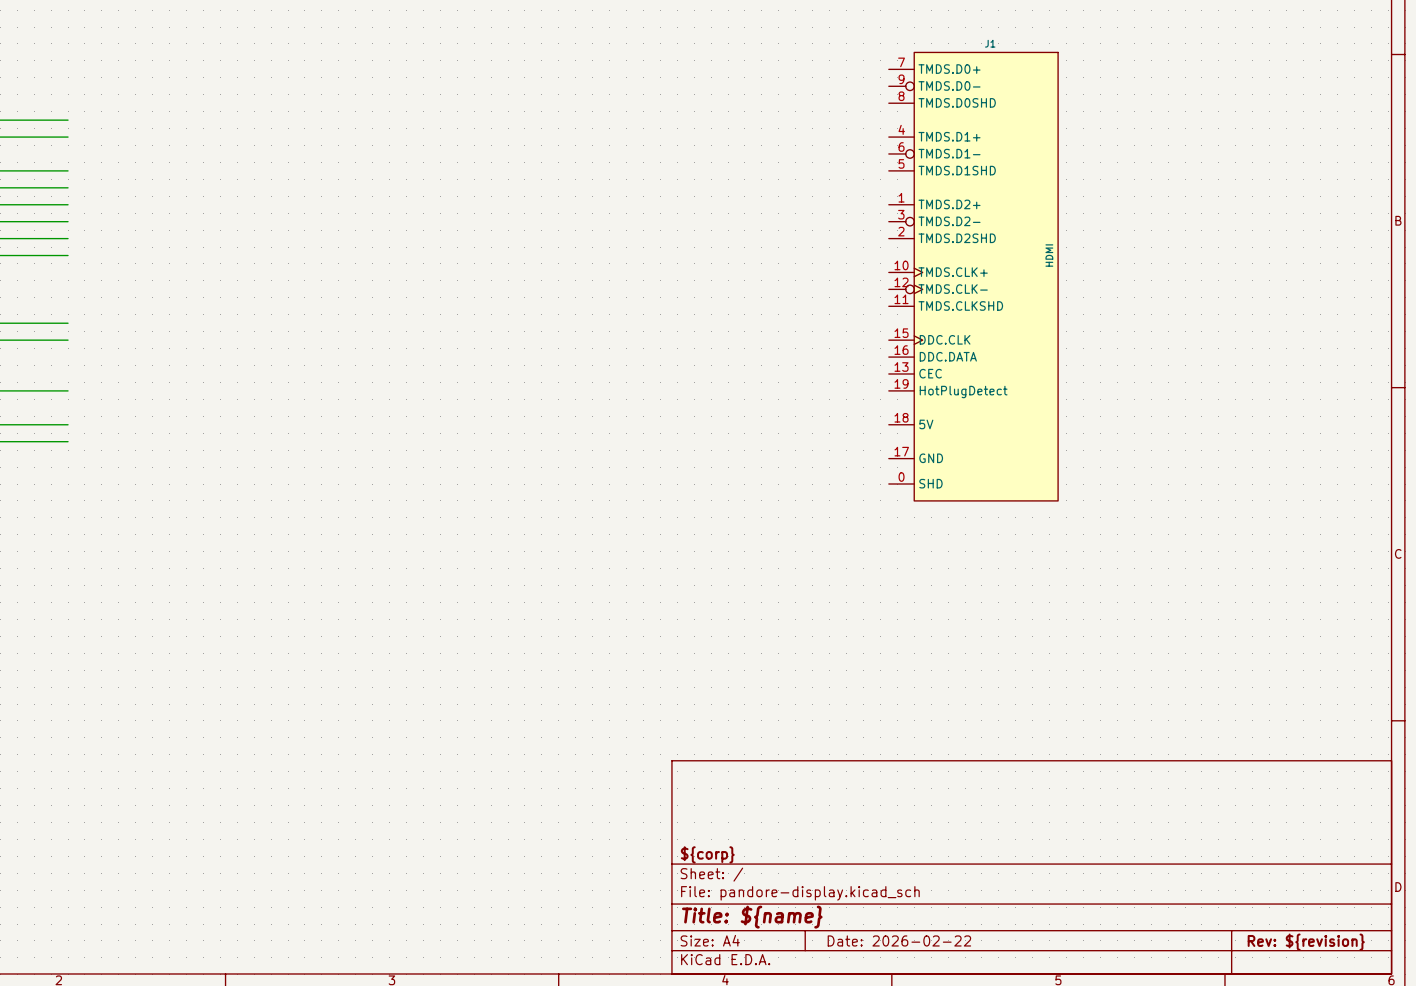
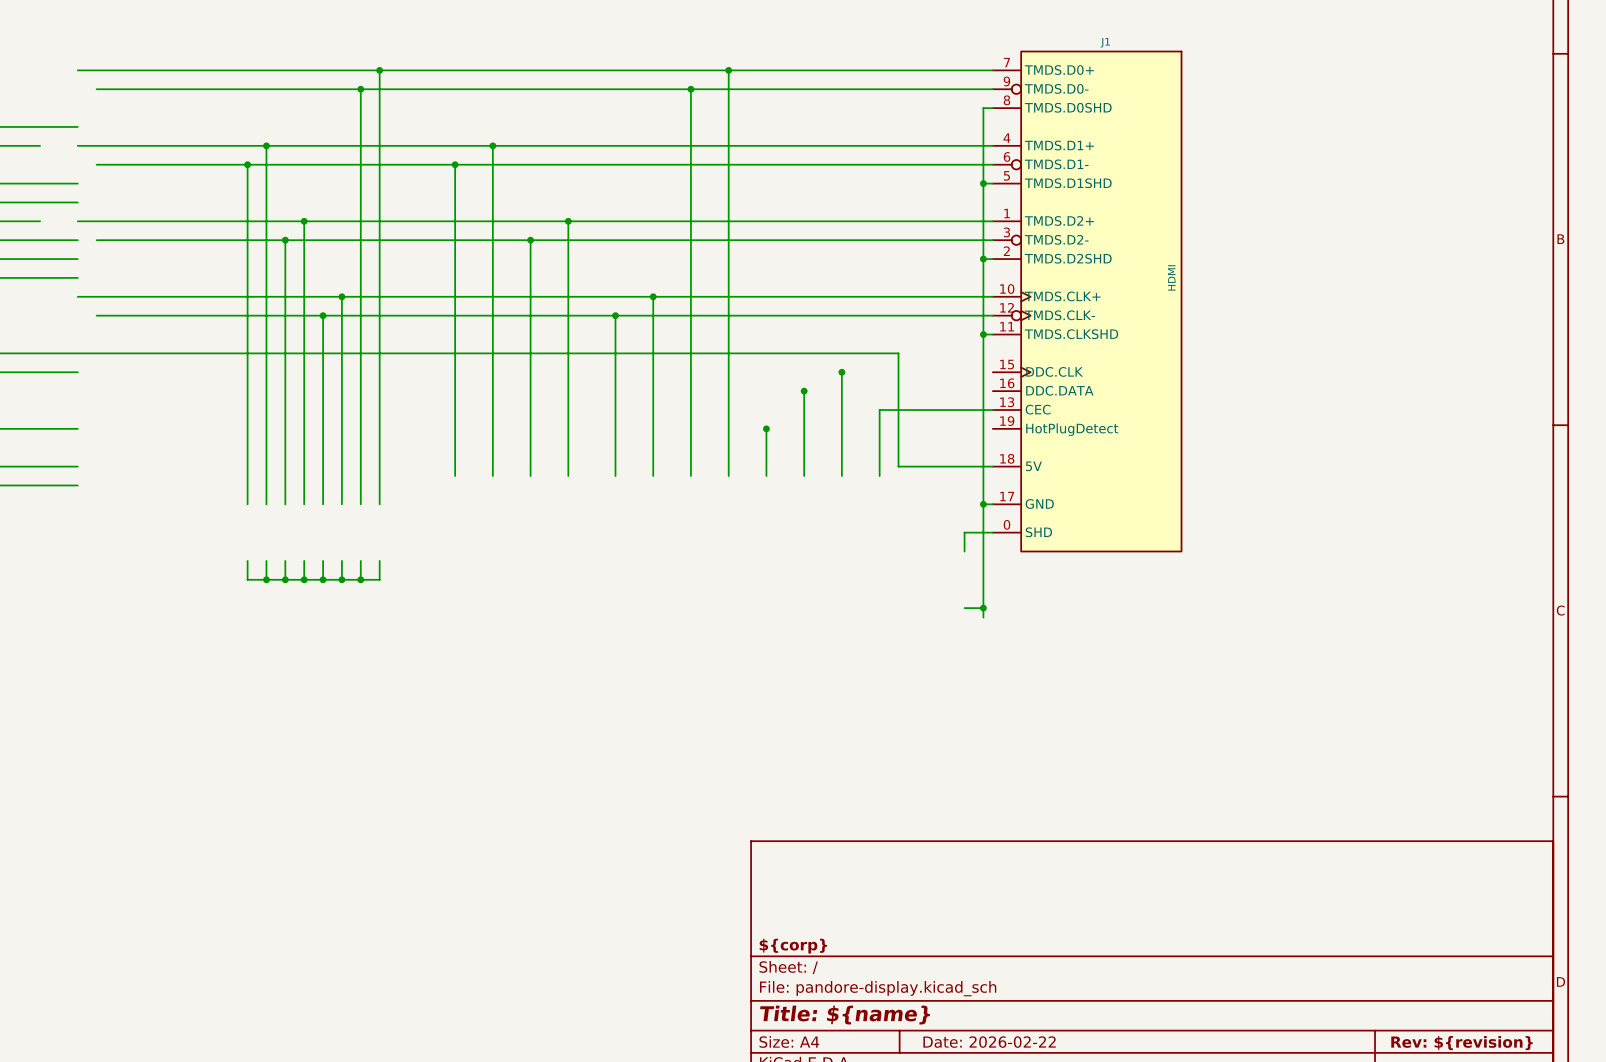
wire: none -> (77, 70) (992, 70)
wire: none -> (379, 70) (379, 504)
junction: none -> (379, 70)
wire: none -> (728, 70) (728, 476)
junction: none -> (728, 70)
wire: none -> (96, 89) (992, 89)
wire: none -> (360, 89) (360, 504)
junction: none -> (360, 89)
wire: none -> (690, 89) (690, 476)
junction: none -> (690, 89)
wire: none -> (992, 108) (983, 108) (983, 617)
wire: (34, 137) (68, 137) -> (992, 145) (77, 145)
wire: none -> (266, 145) (266, 504)
junction: none -> (266, 145)
wire: none -> (492, 145) (492, 476)
junction: none -> (492, 145)
wire: none -> (96, 164) (992, 164)
wire: none -> (247, 164) (247, 504)
junction: none -> (247, 164)
wire: none -> (455, 164) (455, 476)
junction: none -> (455, 164)
wire: none -> (983, 183) (992, 183)
junction: none -> (983, 183)
wire: (34, 204) (68, 204) -> (992, 221) (77, 221)
wire: none -> (304, 221) (304, 504)
junction: none -> (304, 221)
wire: none -> (568, 221) (568, 476)
junction: none -> (568, 221)
wire: none -> (96, 240) (992, 240)
wire: none -> (285, 240) (285, 504)
junction: none -> (285, 240)
wire: none -> (530, 240) (530, 476)
junction: none -> (530, 240)
wire: none -> (983, 259) (992, 259)
junction: none -> (983, 259)
wire: none -> (77, 296) (992, 296)
wire: none -> (341, 296) (341, 504)
junction: none -> (341, 296)
wire: none -> (653, 296) (653, 476)
junction: none -> (653, 296)
wire: none -> (96, 315) (992, 315)
wire: none -> (323, 315) (323, 504)
junction: none -> (323, 315)
wire: none -> (615, 315) (615, 476)
junction: none -> (615, 315)
wire: none -> (983, 334) (992, 334)
junction: none -> (983, 334)
wire: none -> (77, 353) (898, 353) (898, 466) (992, 466)
wire: none -> (841, 372) (841, 476)
junction: none -> (841, 372)
wire: none -> (804, 391) (804, 476)
junction: none -> (804, 391)
wire: none -> (992, 409) (879, 409) (879, 476)
wire: none -> (766, 428) (766, 476)
junction: none -> (766, 428)
wire: none -> (983, 504) (992, 504)
junction: none -> (983, 504)
wire: none -> (992, 532) (964, 532) (964, 551)
wire: none -> (247, 560) (247, 579) (379, 579) (379, 560)
wire: none -> (266, 560) (266, 579)
wire: none -> (285, 560) (285, 579)
wire: none -> (304, 560) (304, 579)
wire: none -> (323, 560) (323, 579)
wire: none -> (341, 560) (341, 579)
wire: none -> (360, 560) (360, 579)
junction: none -> (266, 579)
junction: none -> (285, 579)
junction: none -> (304, 579)
junction: none -> (323, 579)
junction: none -> (341, 579)
junction: none -> (360, 579)
wire: none -> (964, 608) (983, 608)
junction: none -> (983, 608)

